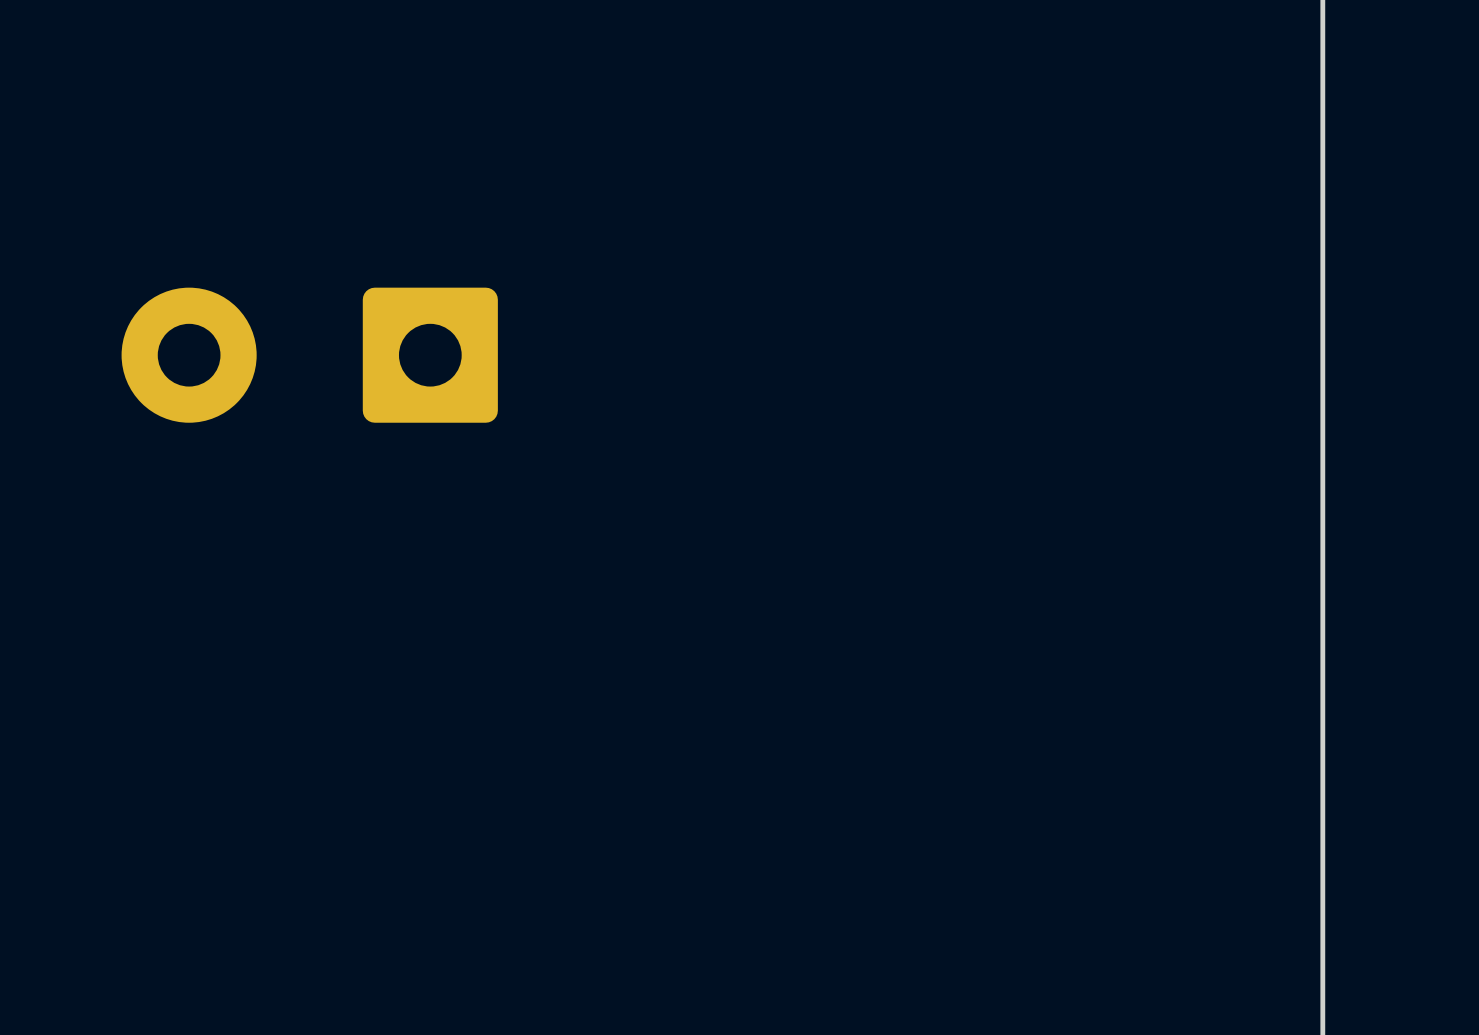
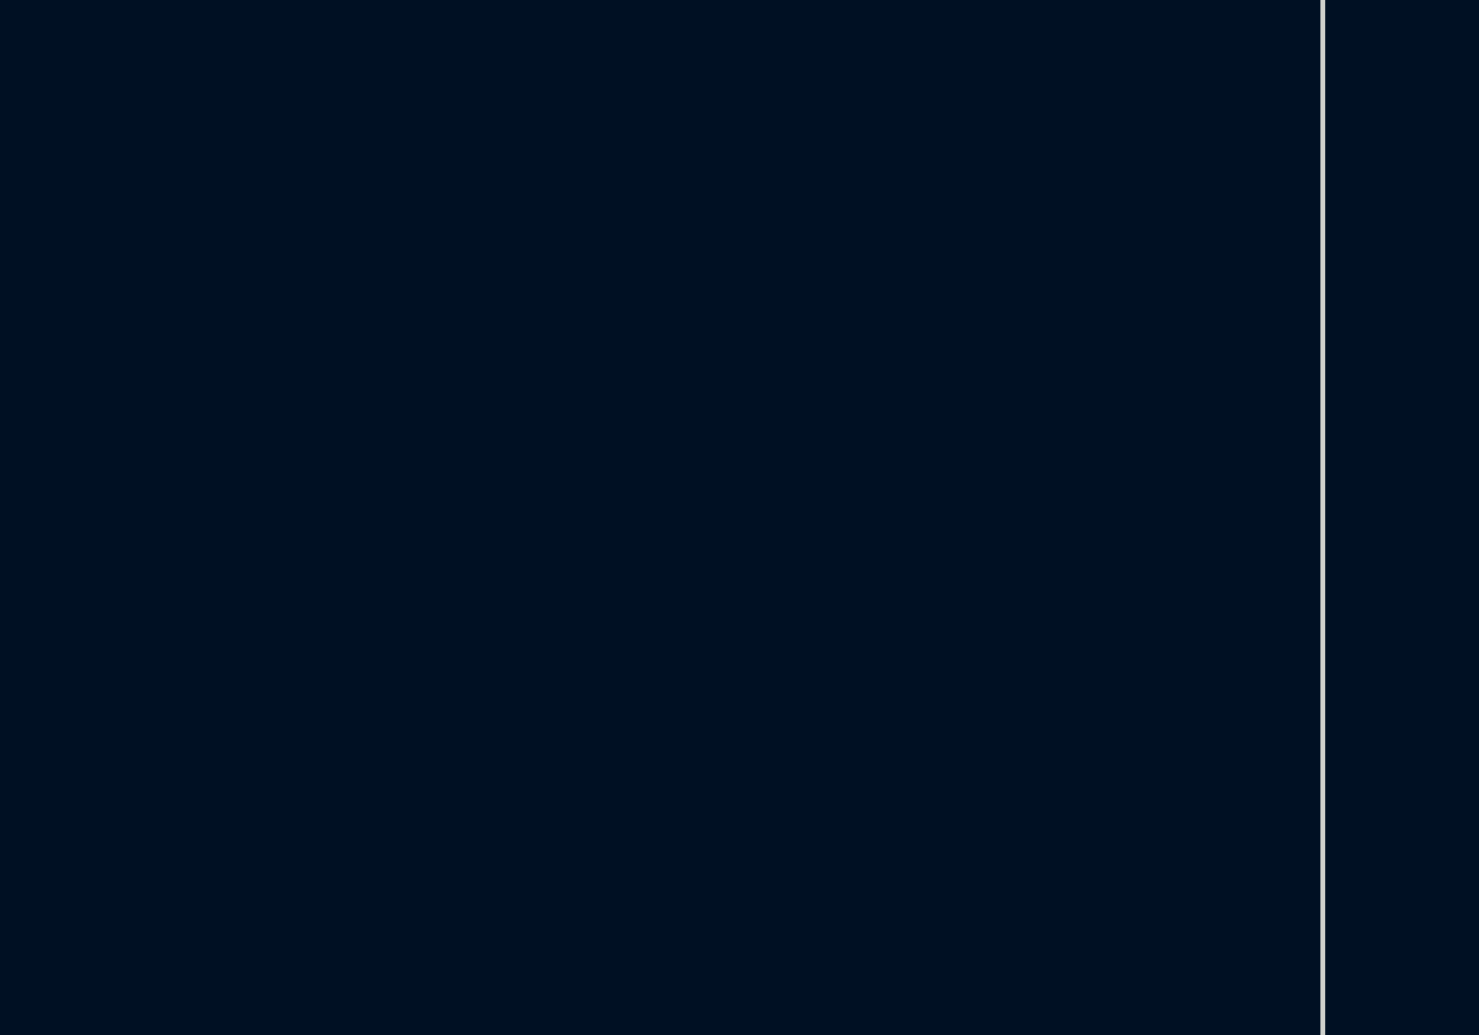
part: (309, 355) -> none

